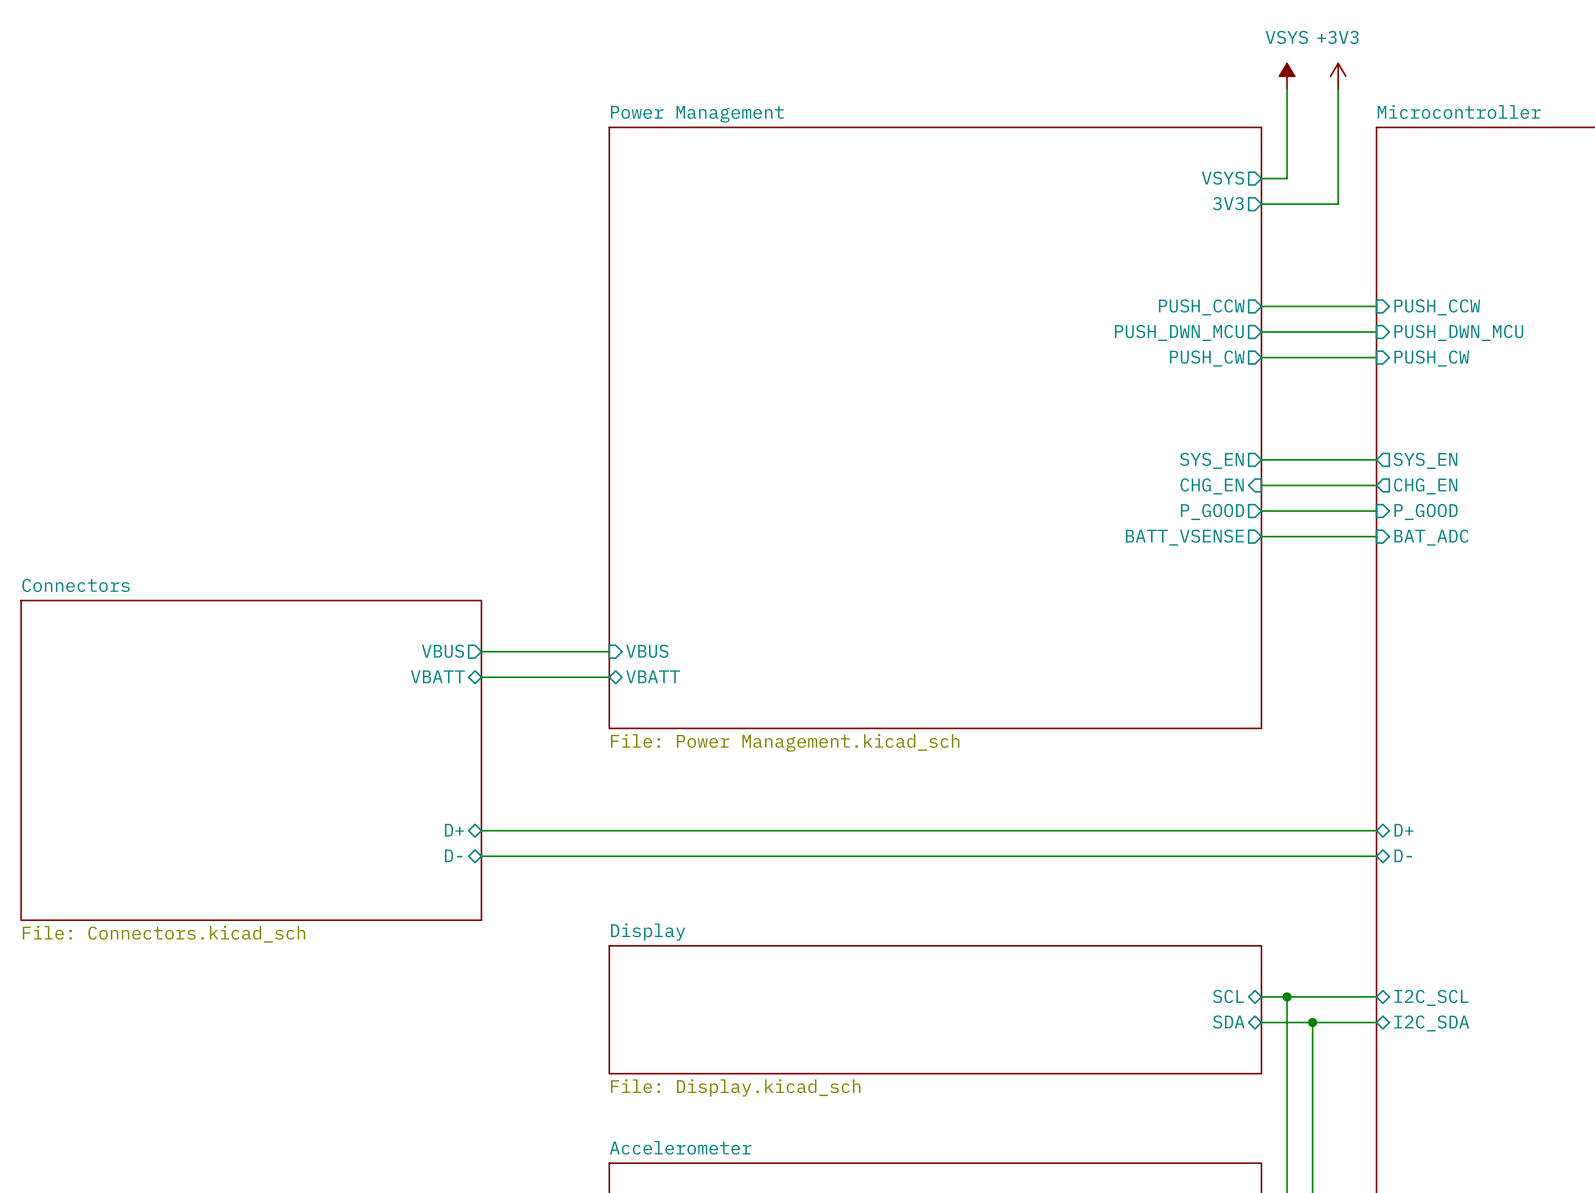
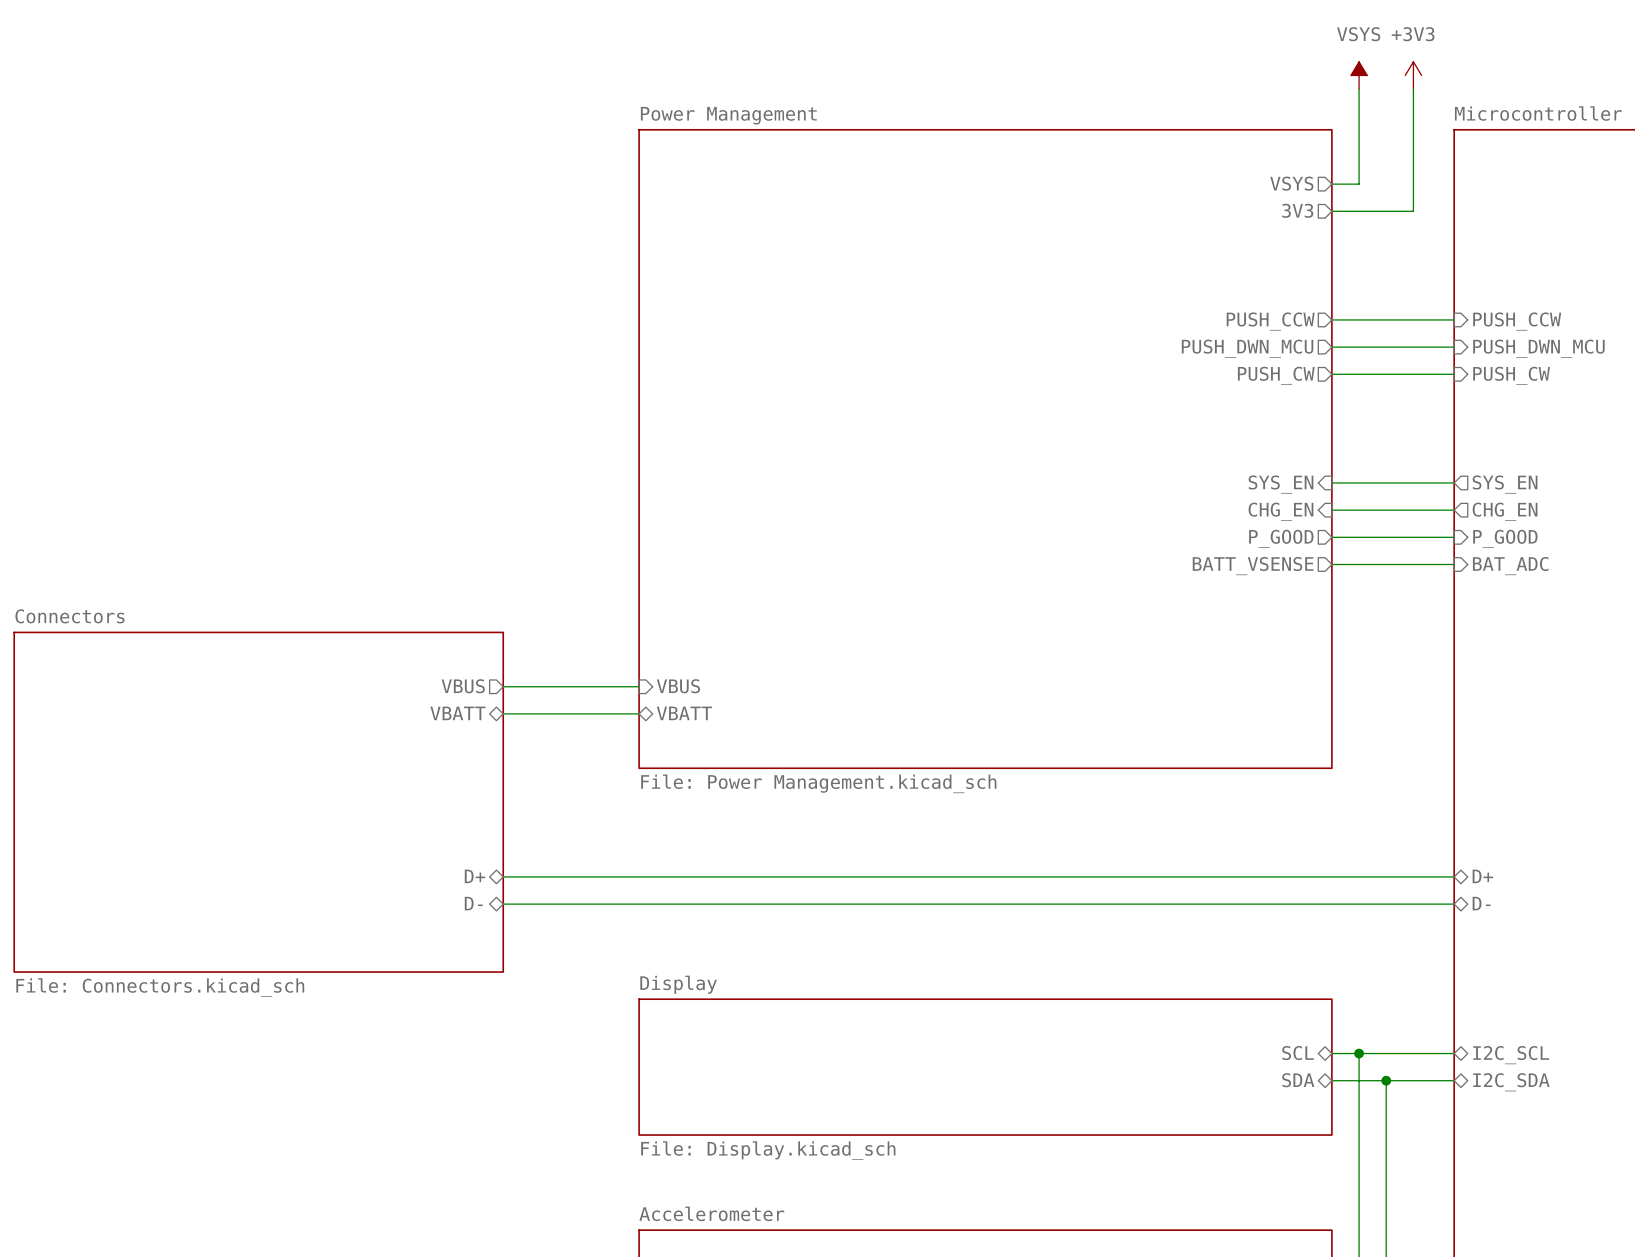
sheet pin shape: output (1211, 460) -> input (1280, 484)

